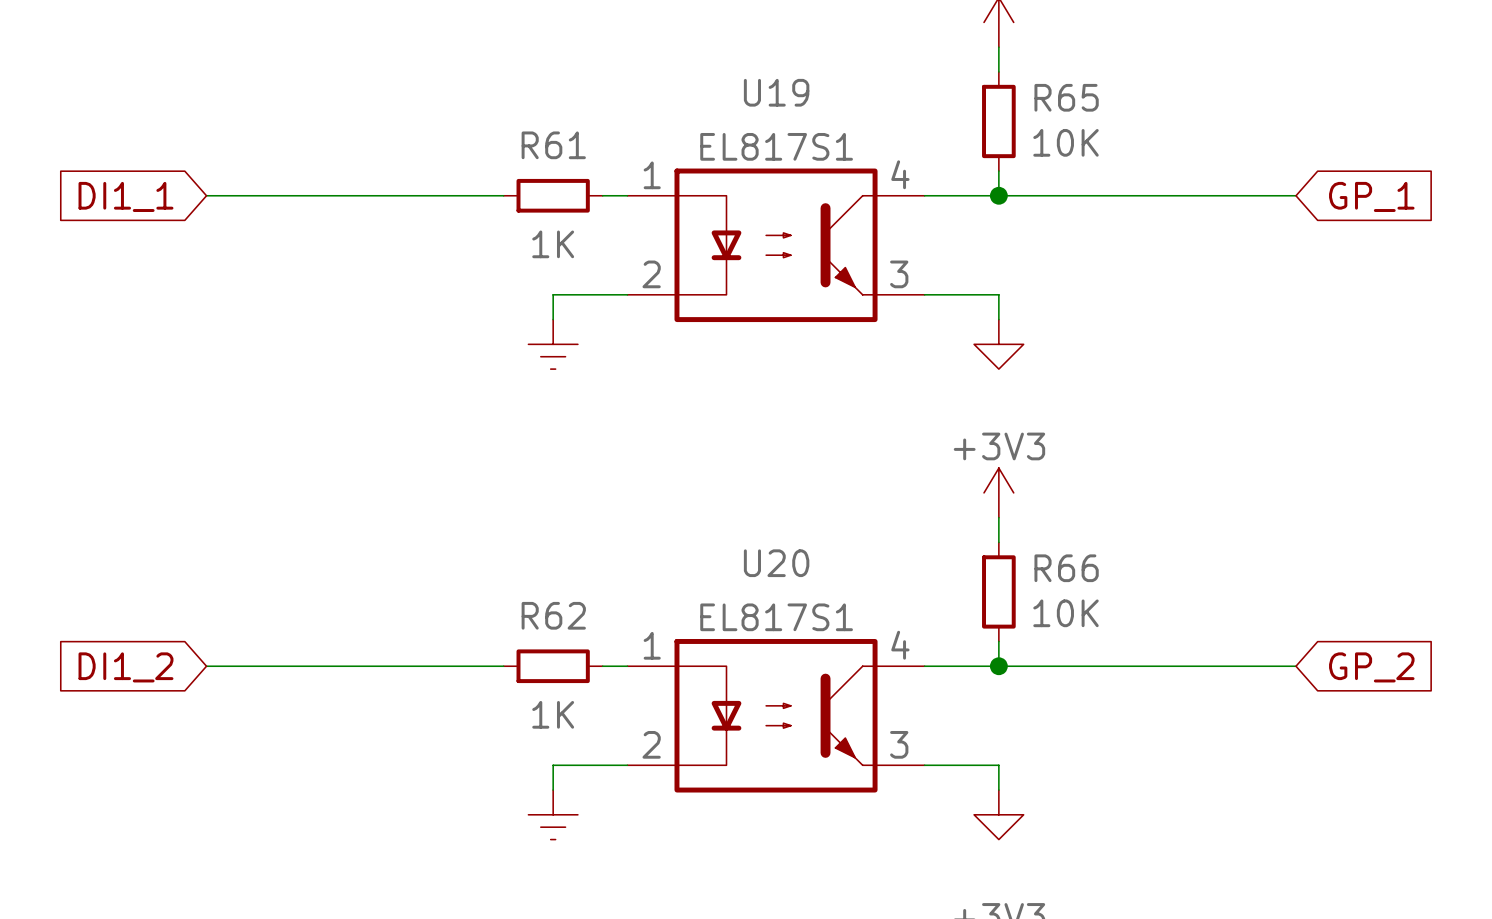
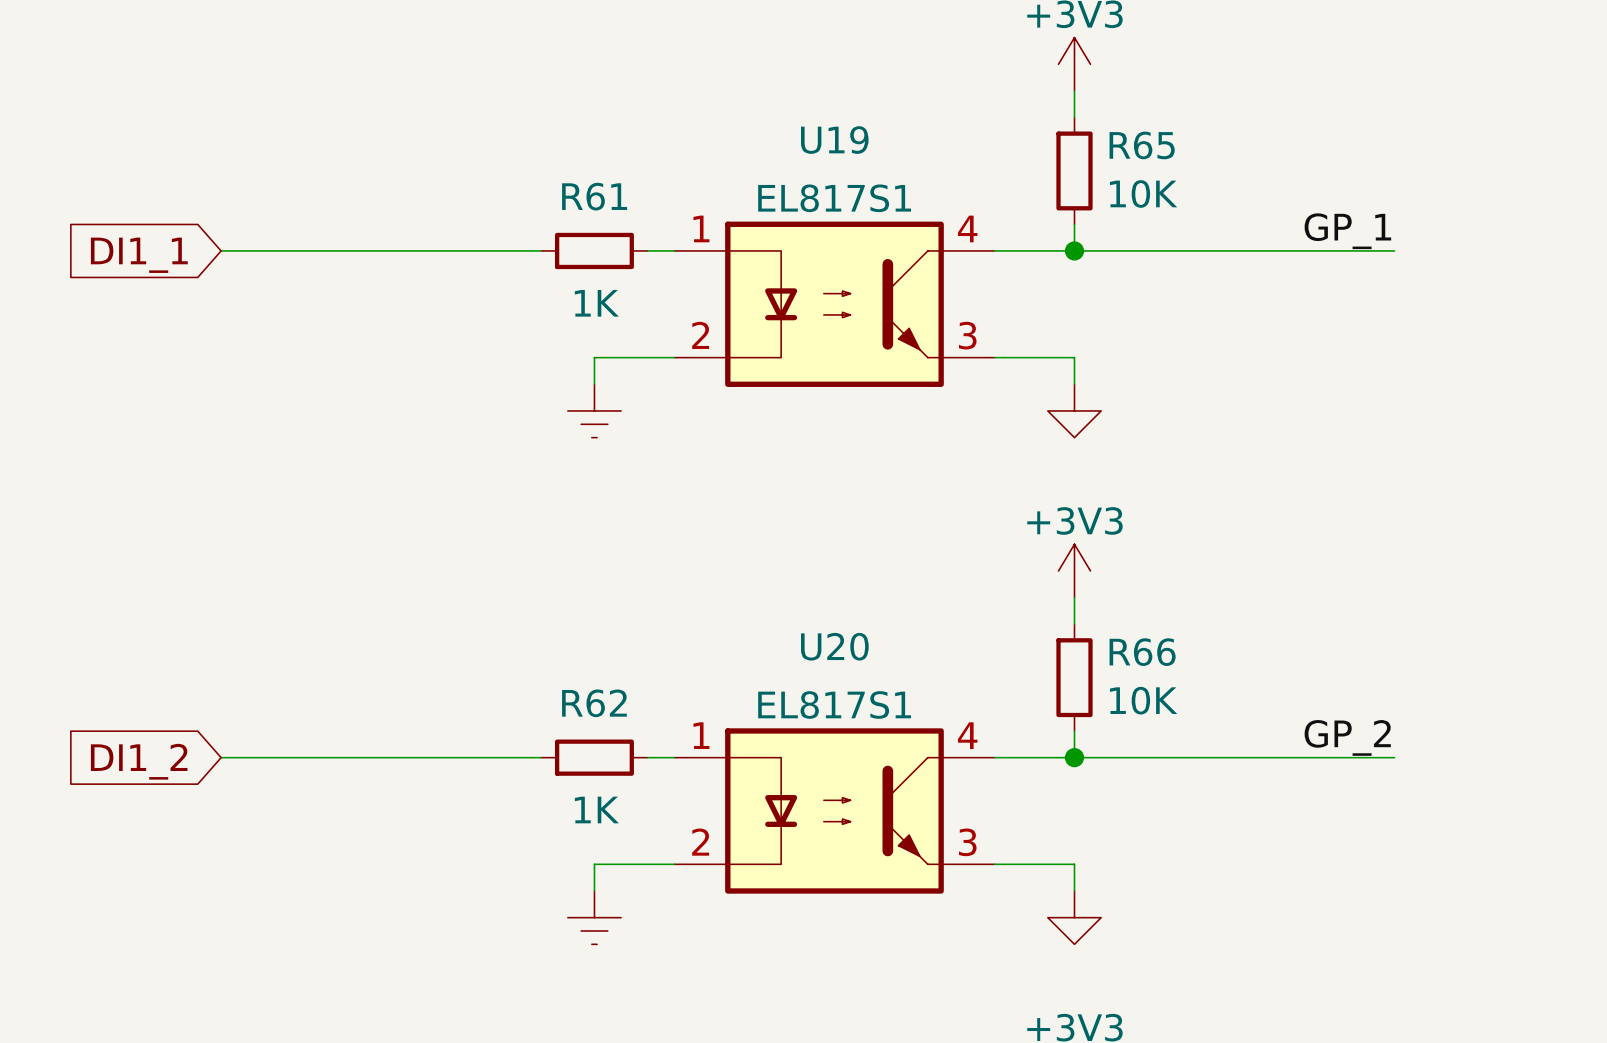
label: none -> GP_1 (1347, 231)
global label: GP_1 (1371, 196) -> none
label: none -> GP_2 (1347, 737)
global label: GP_2 (1371, 667) -> none

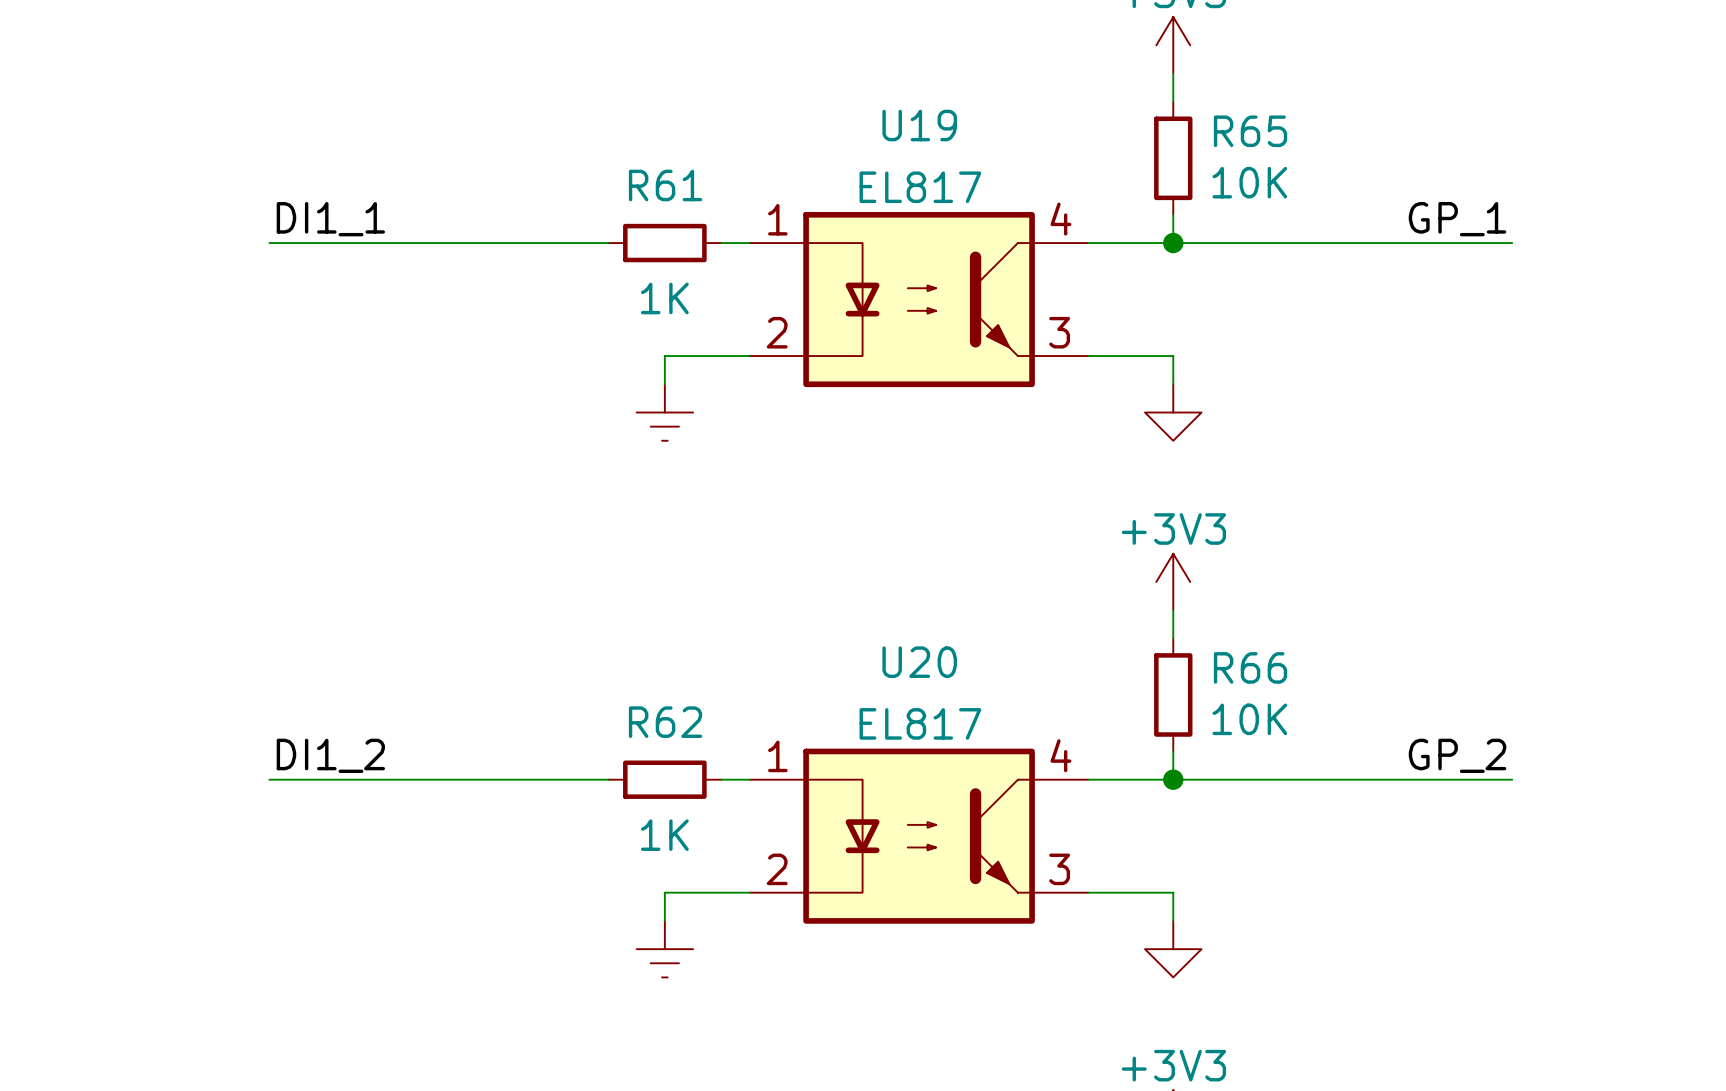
U19 value: EL817S1 (834, 198) -> EL817 (920, 187)
label: none -> DI1_1 (330, 219)
global label: DI1_1 (139, 255) -> none
U20 value: EL817S1 (834, 704) -> EL817 (920, 723)
label: none -> DI1_2 (330, 755)
global label: DI1_2 (139, 761) -> none

